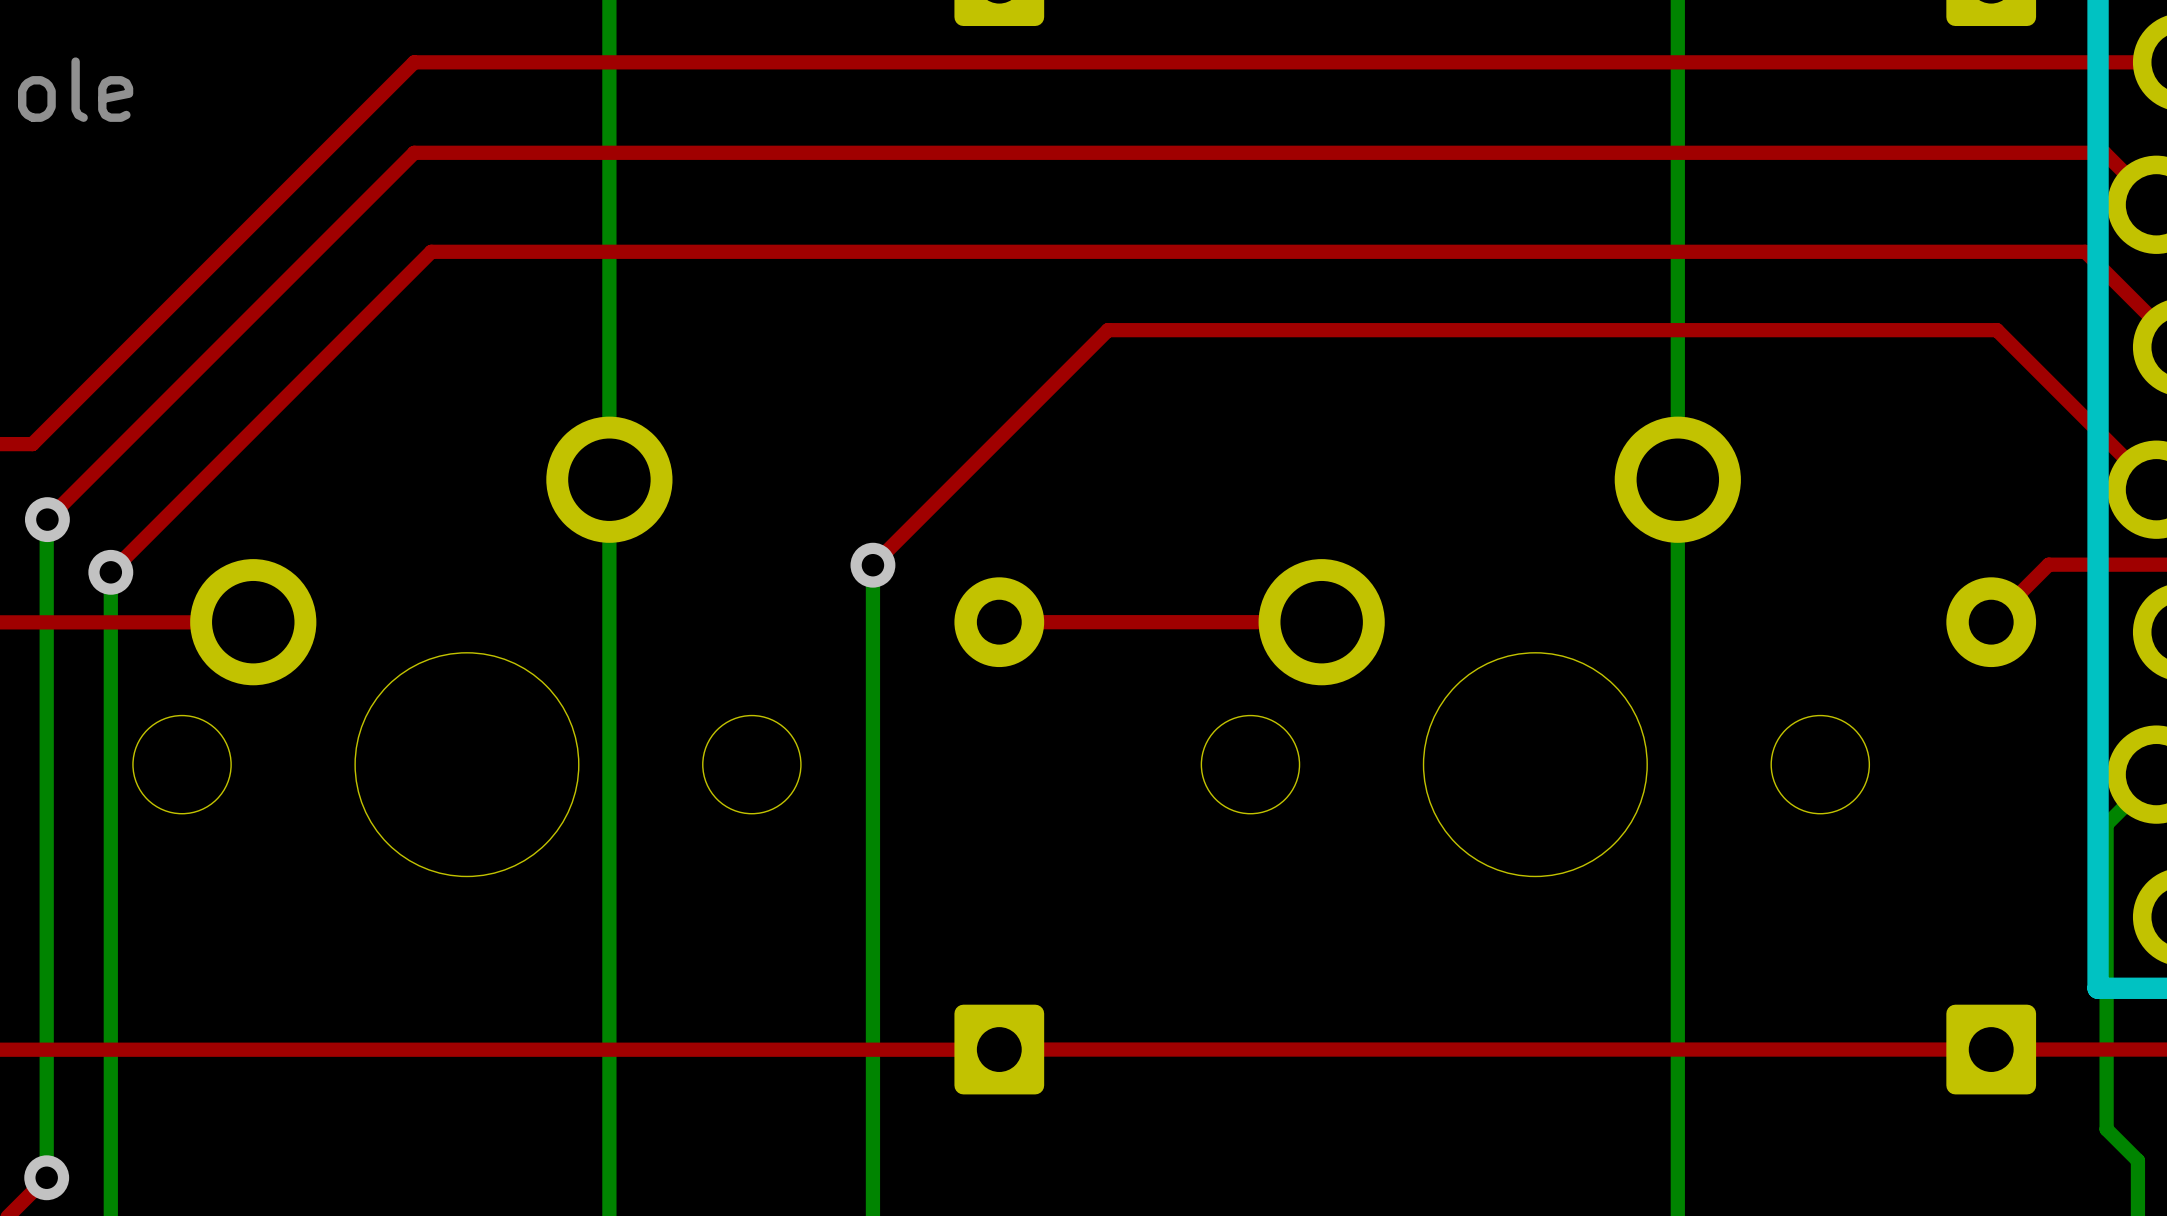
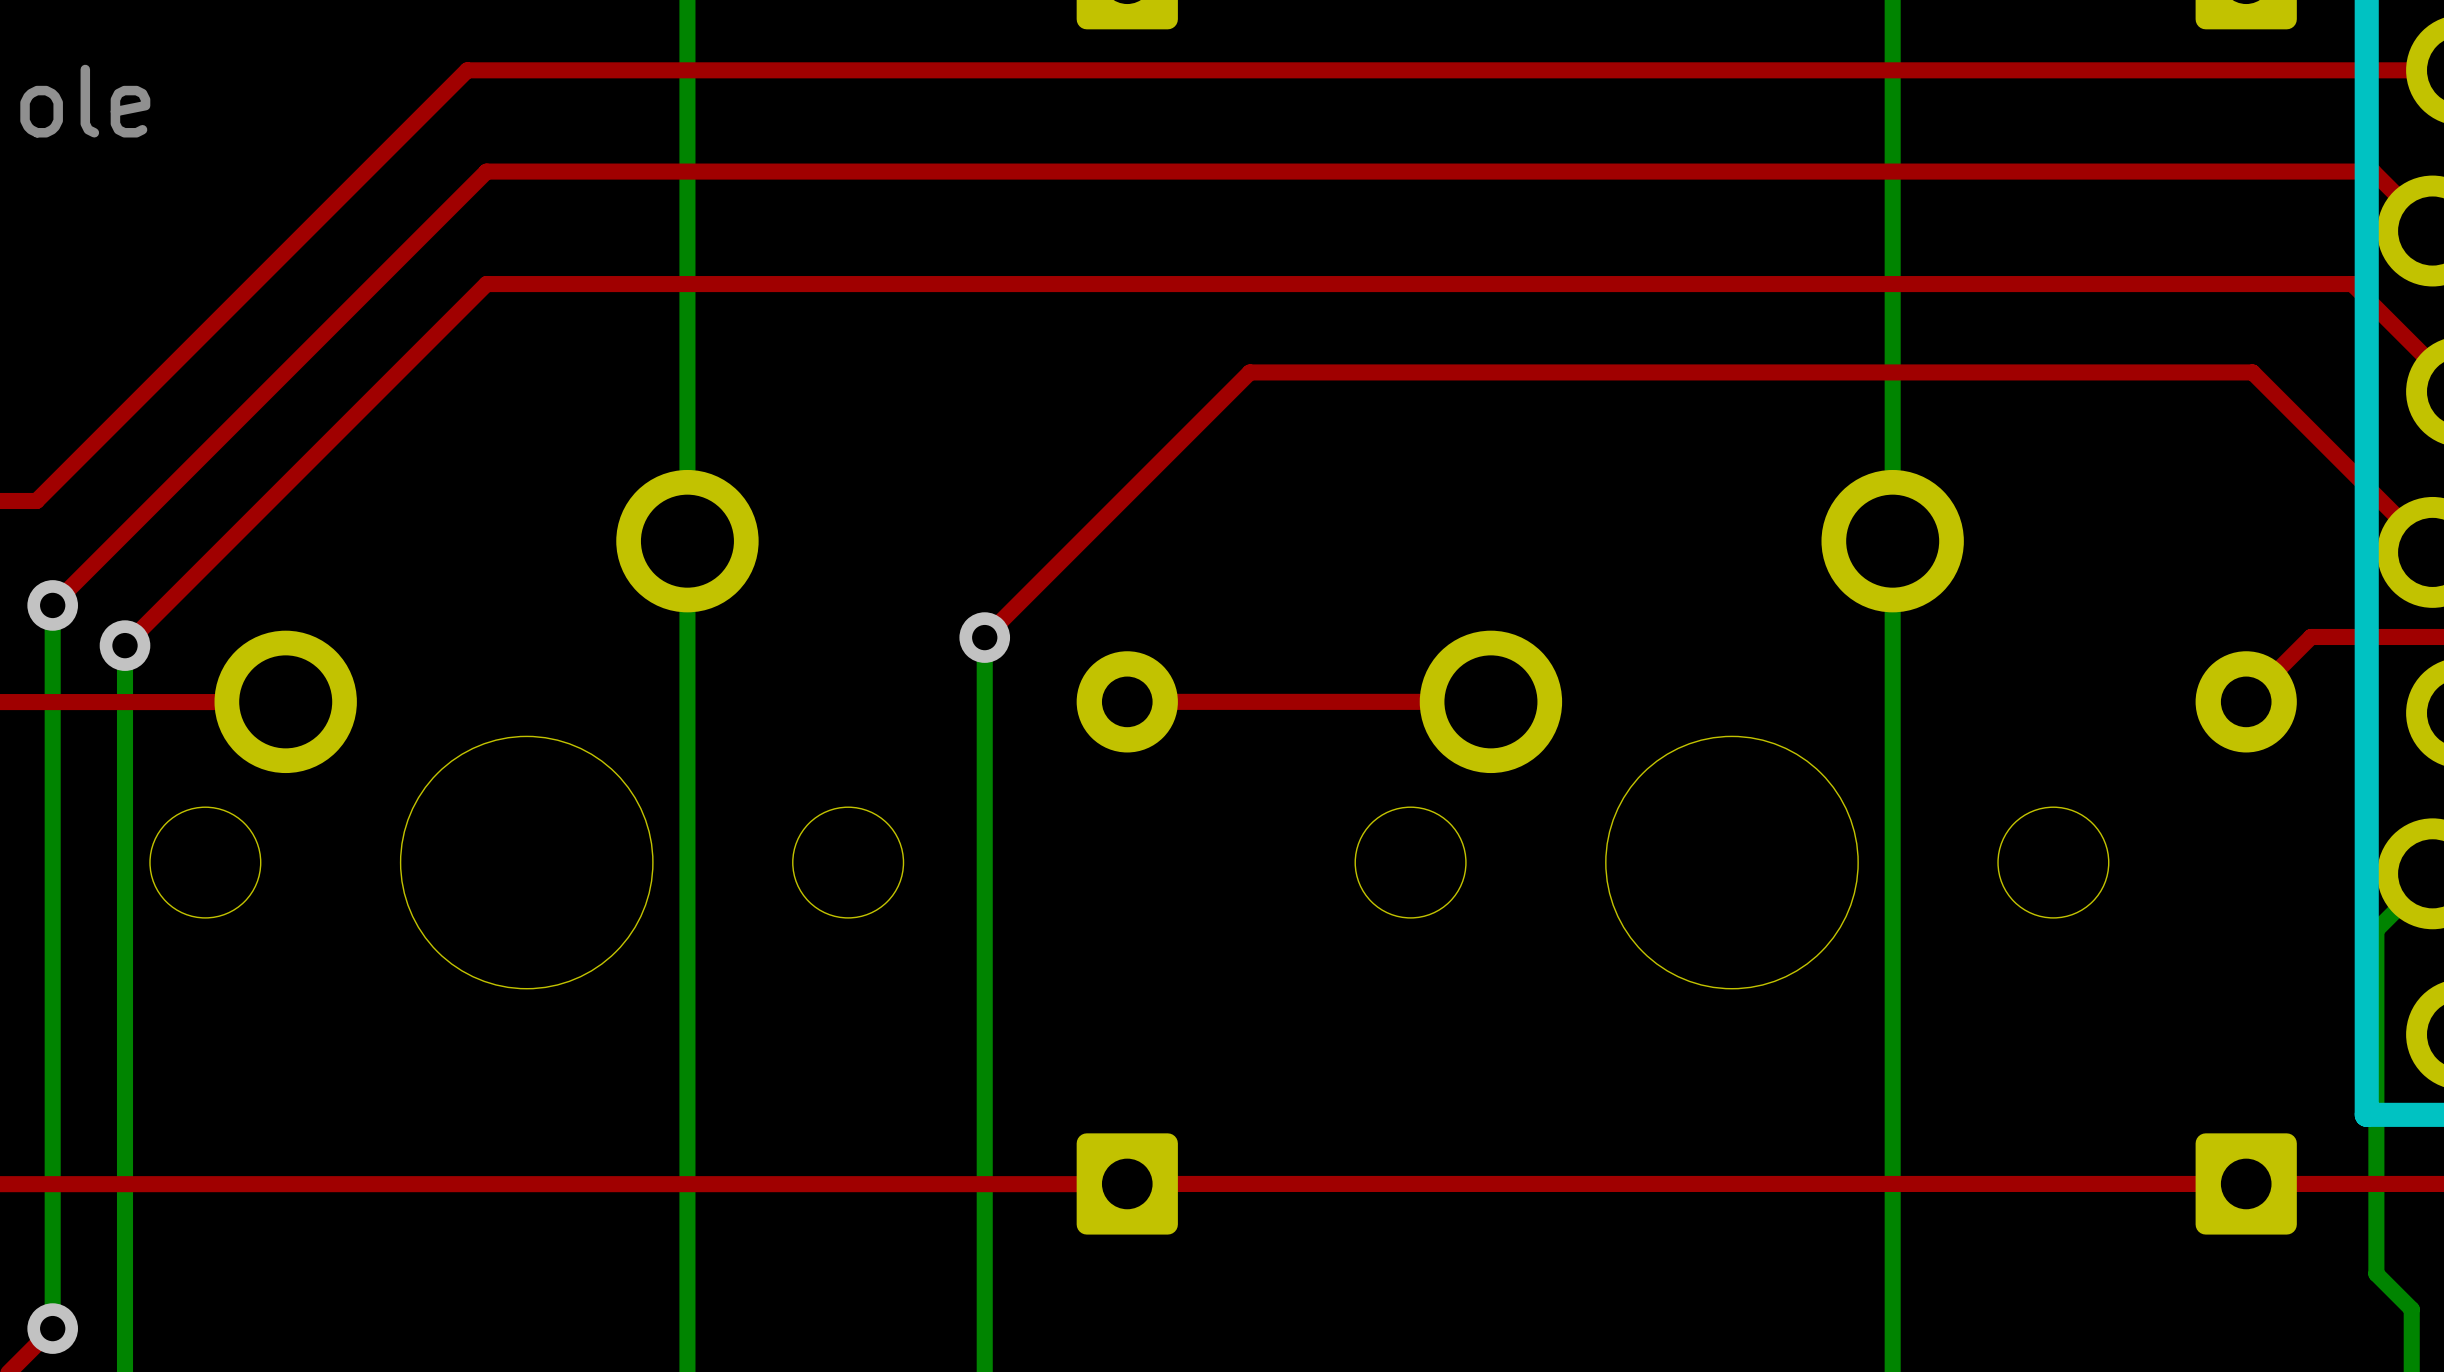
top track: (2104, 152) (414, 152) (47, 519) -> (2373, 171) (486, 171) (52, 605)
via position: (47, 519) -> (52, 605)
bottom track: (46, 520) (46, 1177) -> (52, 605) (52, 1328)

